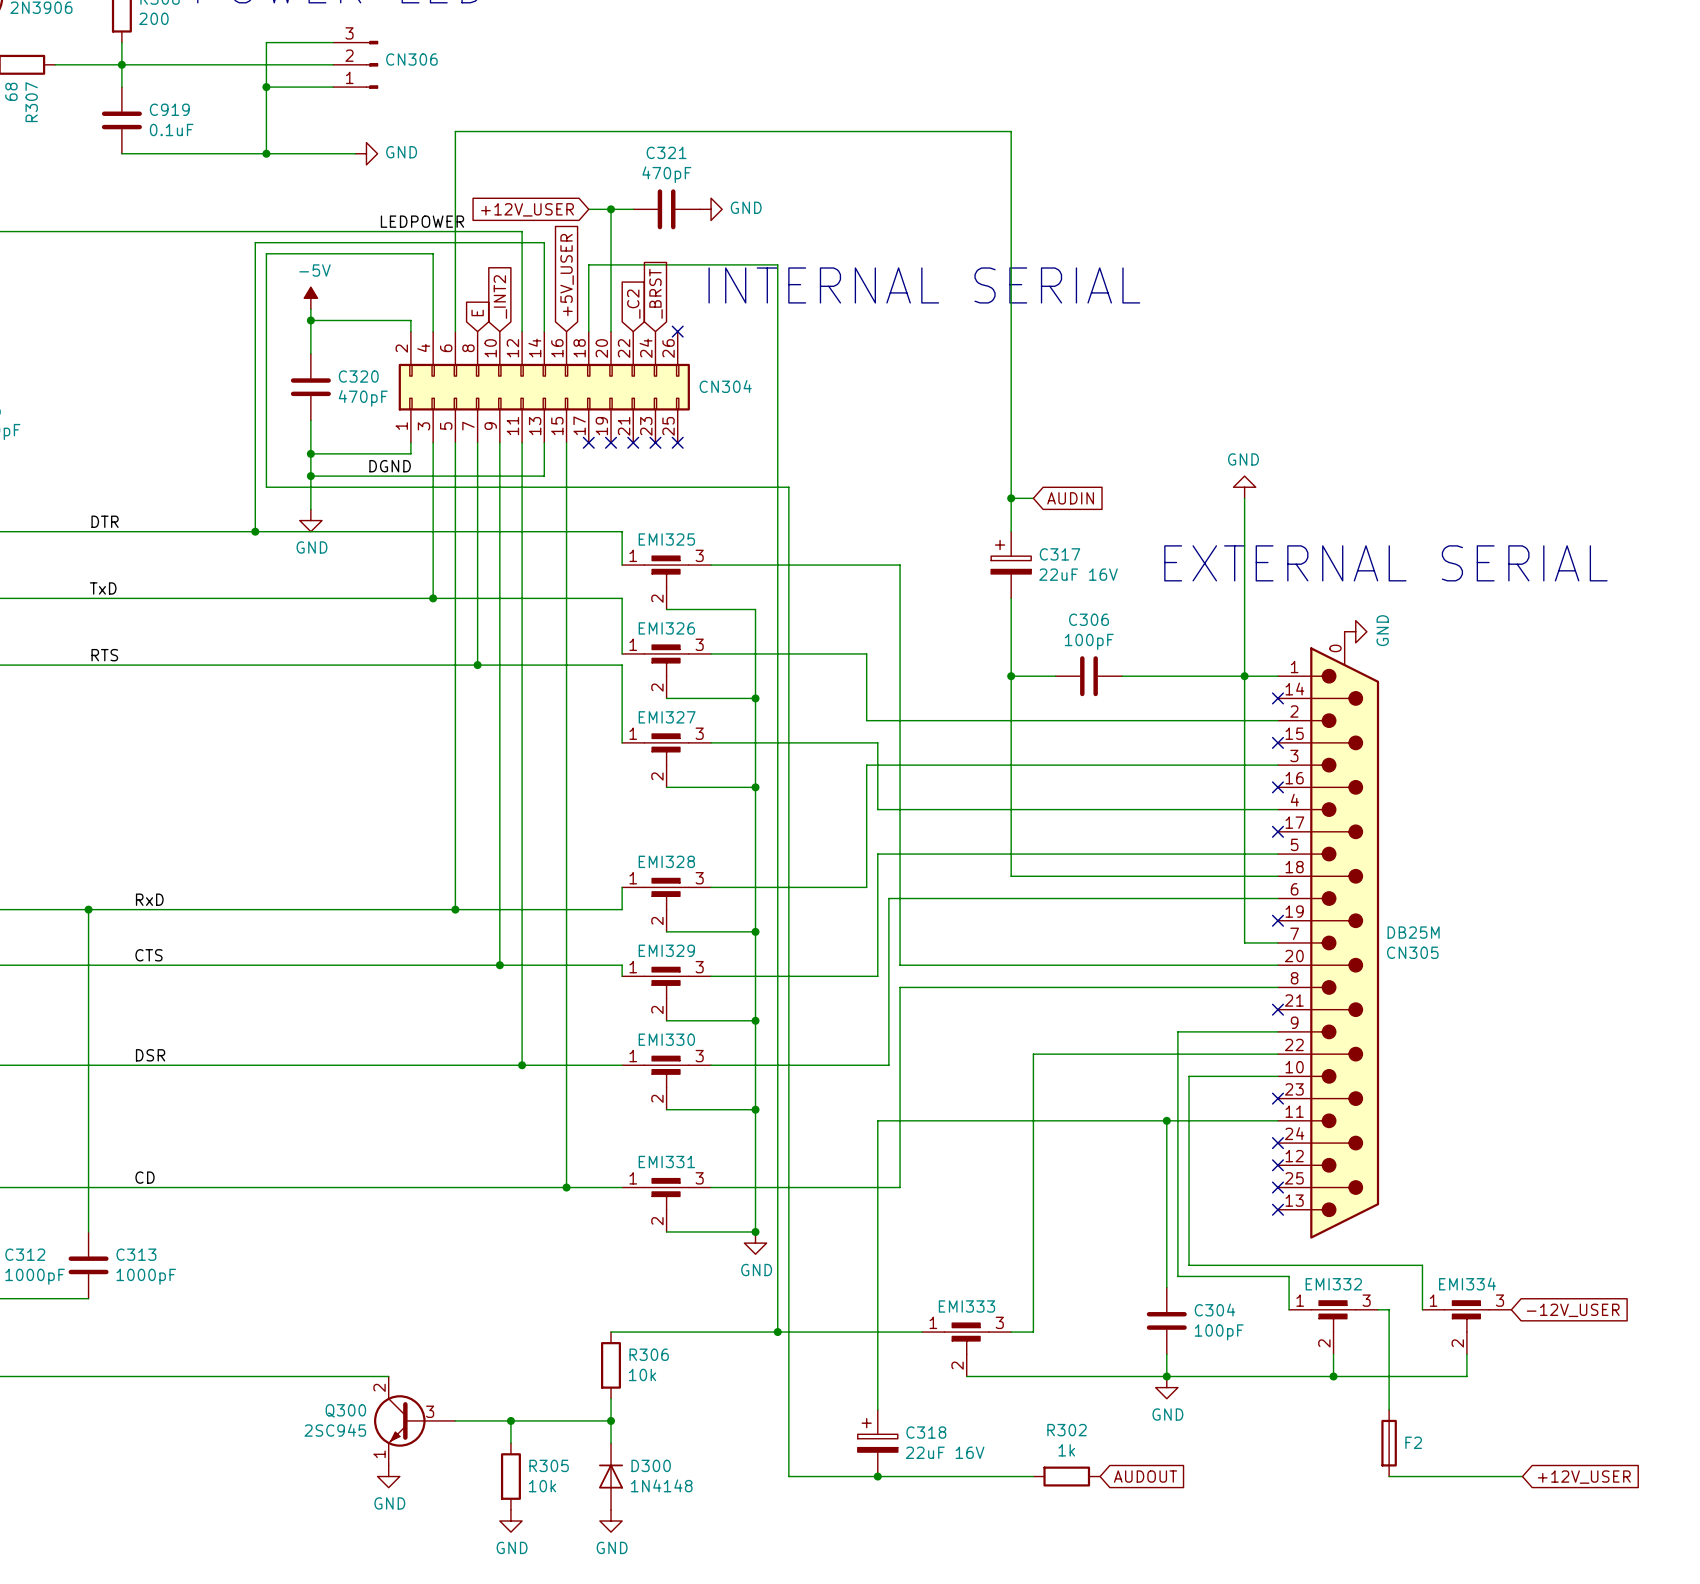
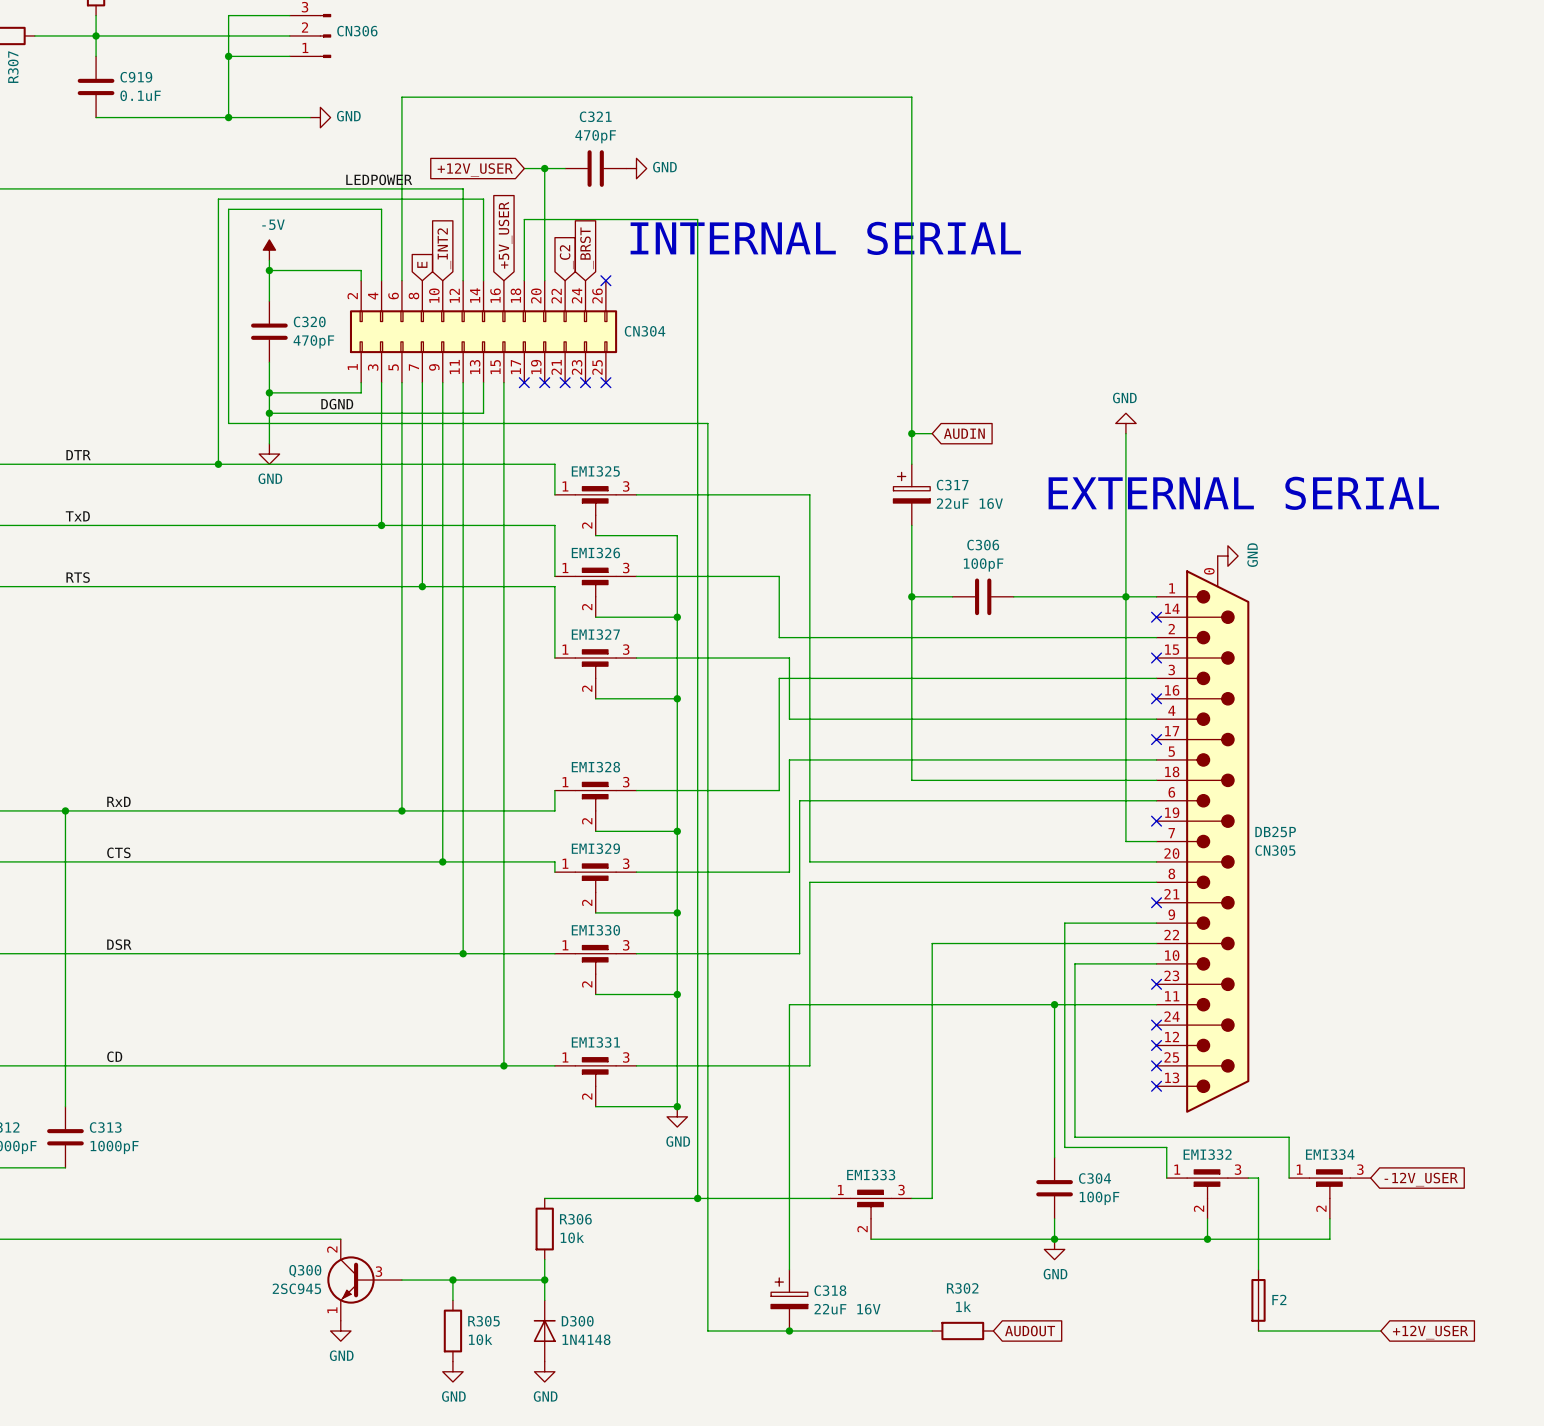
CN305 value: DB25M (1413, 932) -> DB25P (1275, 831)

